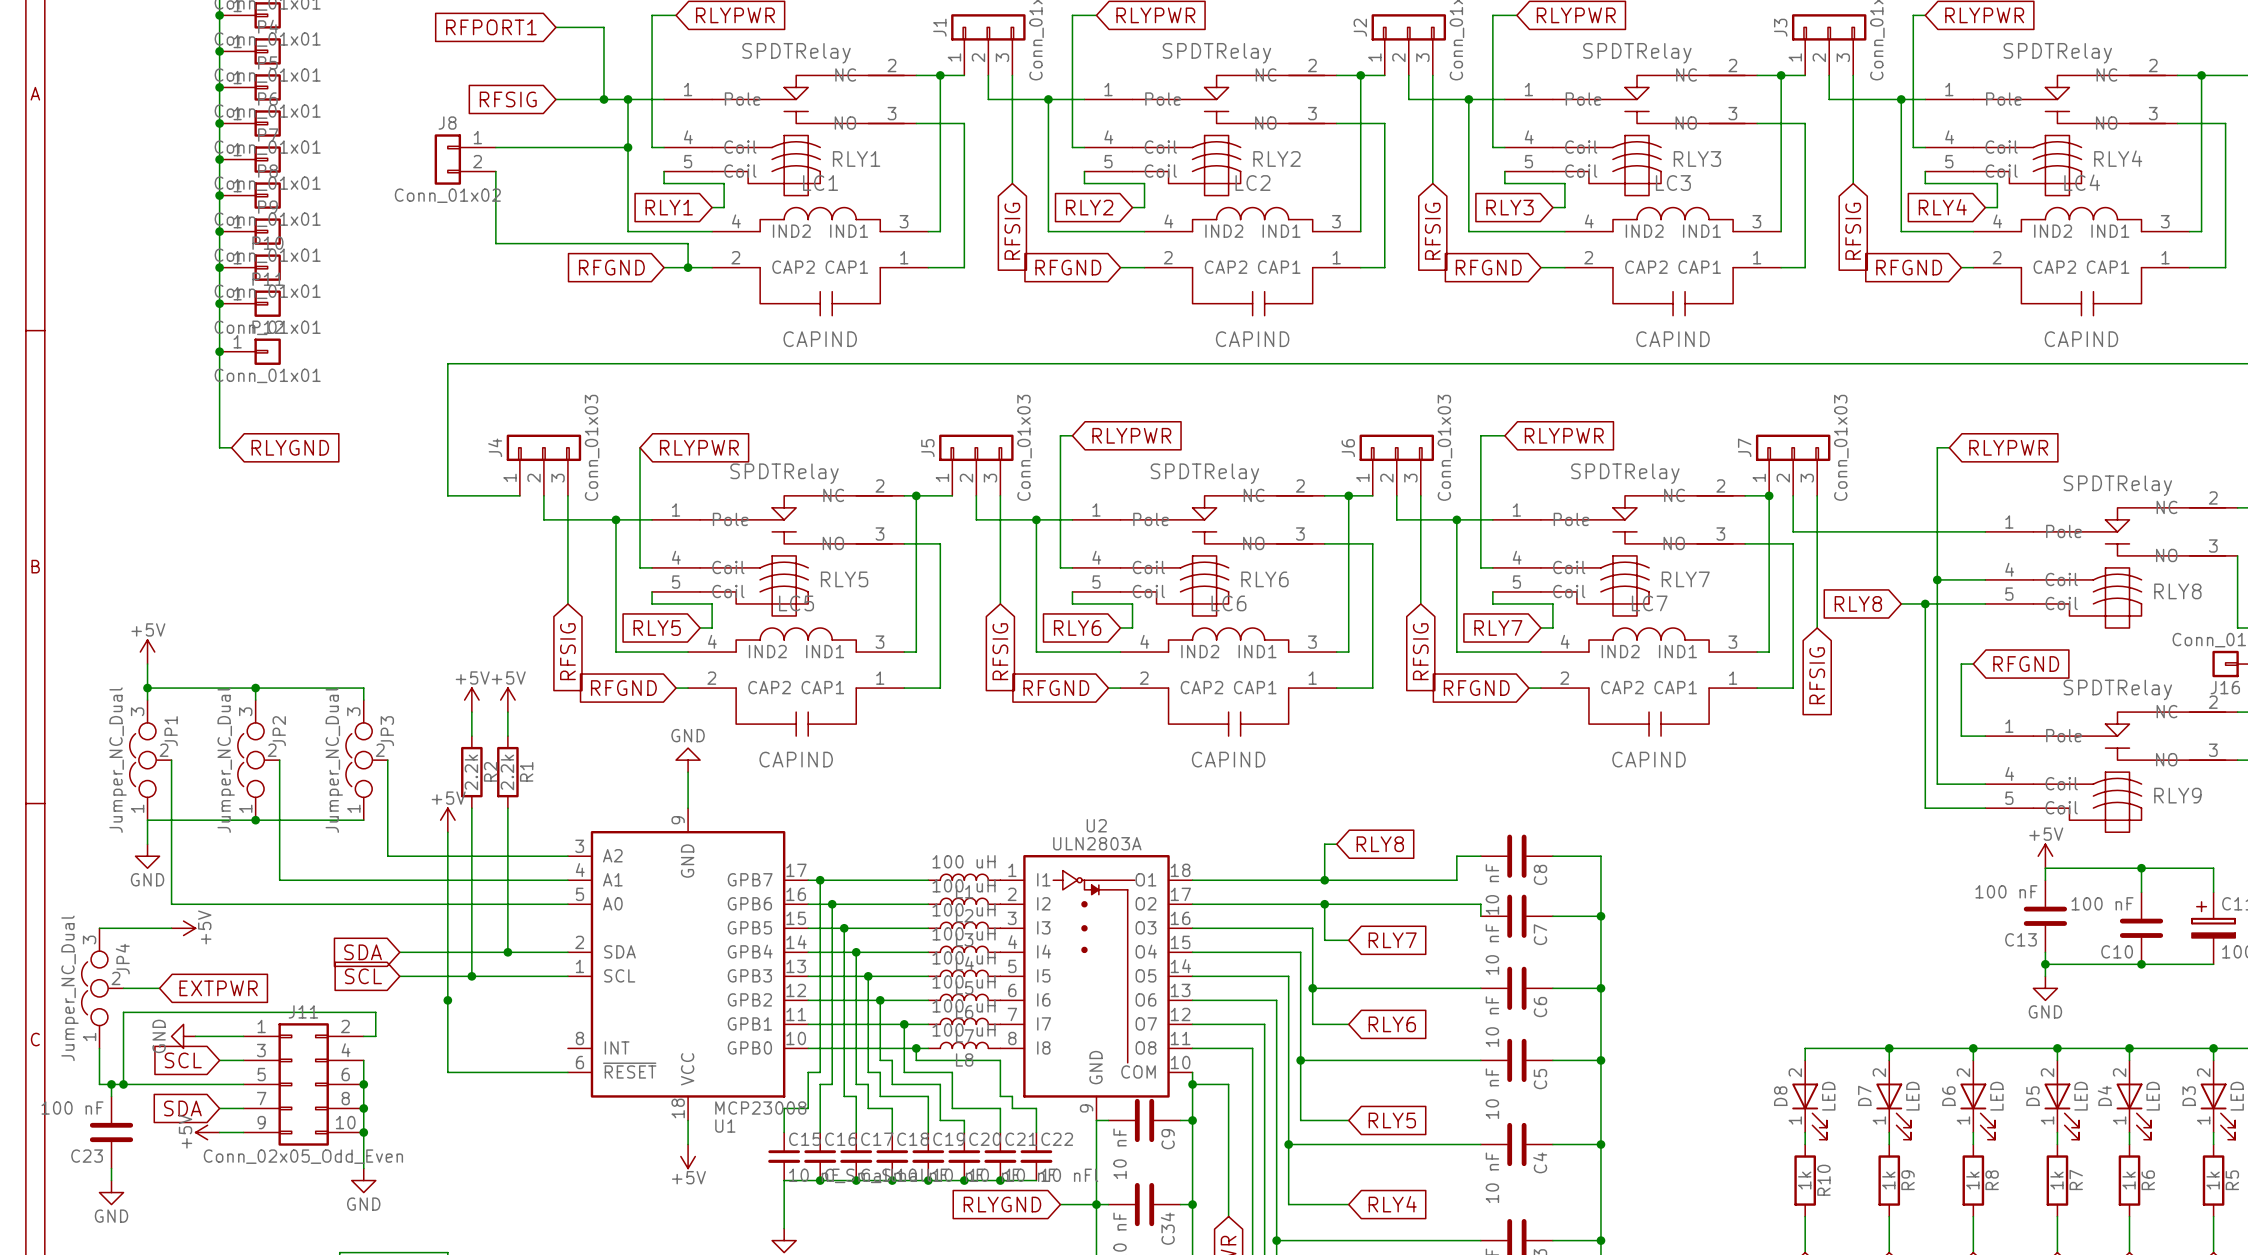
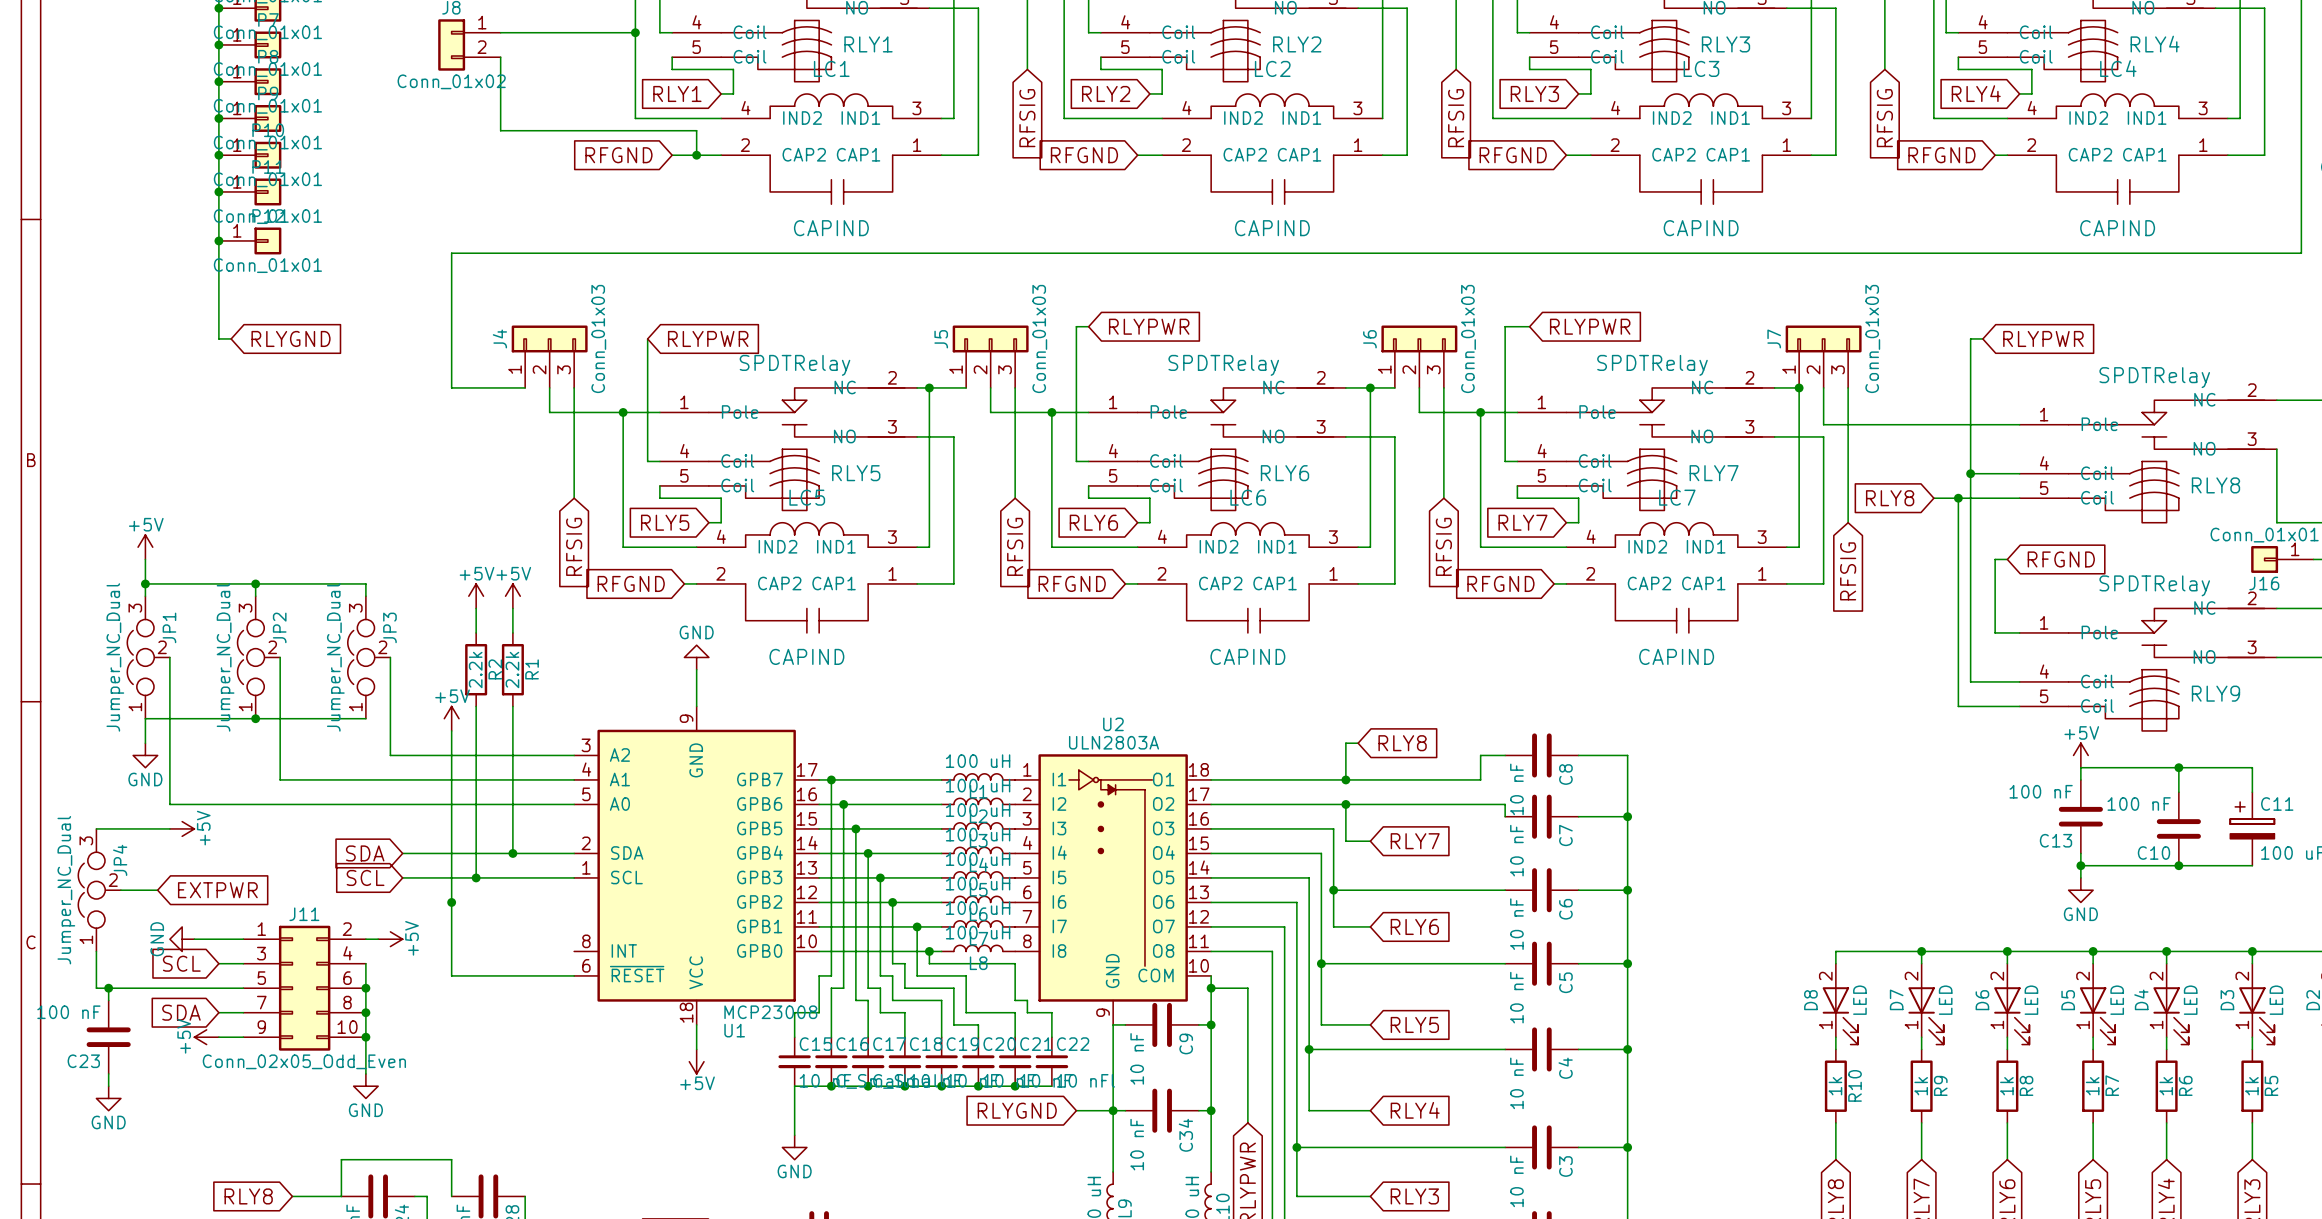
wire: (375, 1036) (375, 1012) (123, 1012) (123, 1084) -> none
power symbol: none -> +5V (390, 939)
junction: (123, 1084) -> none

